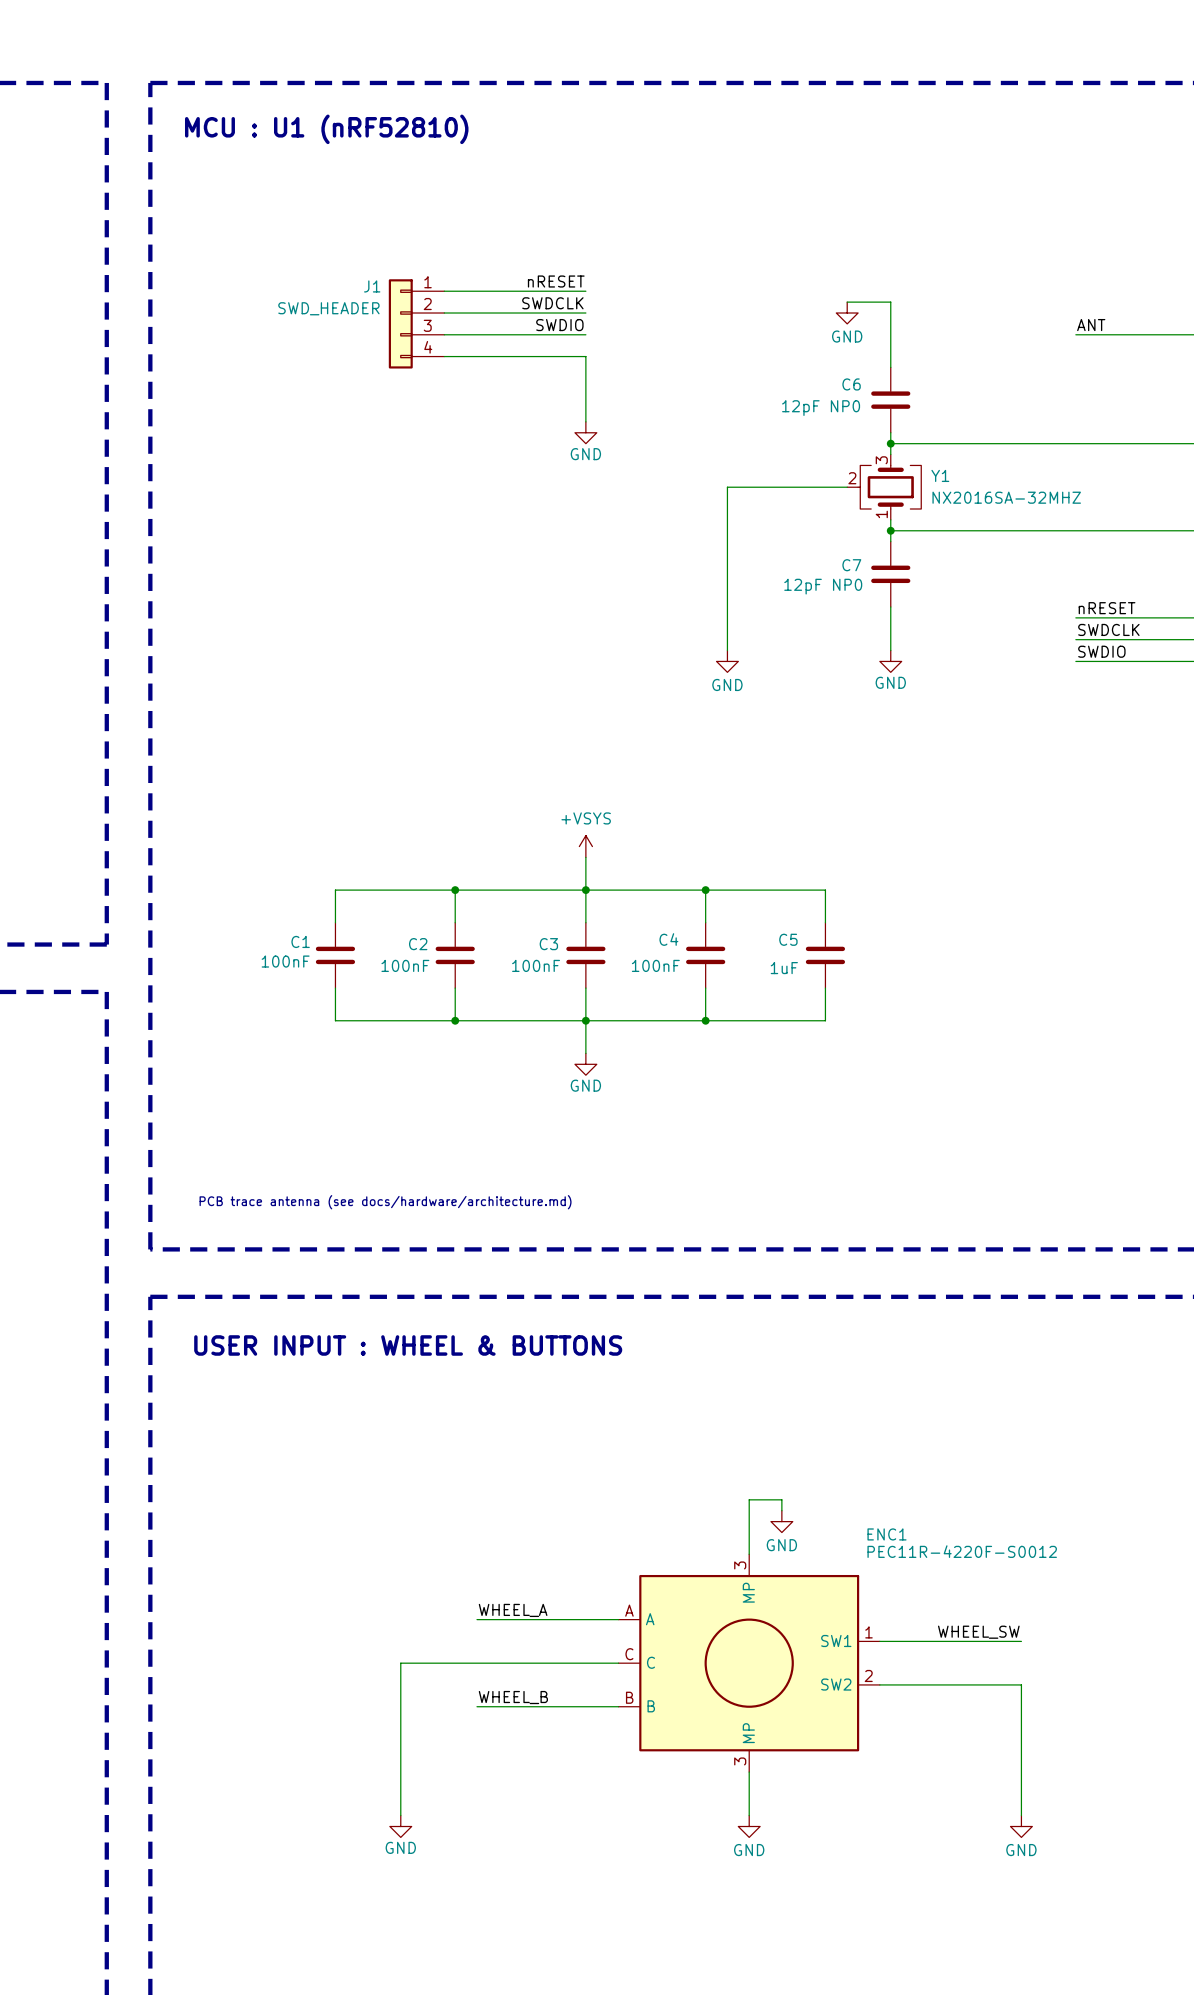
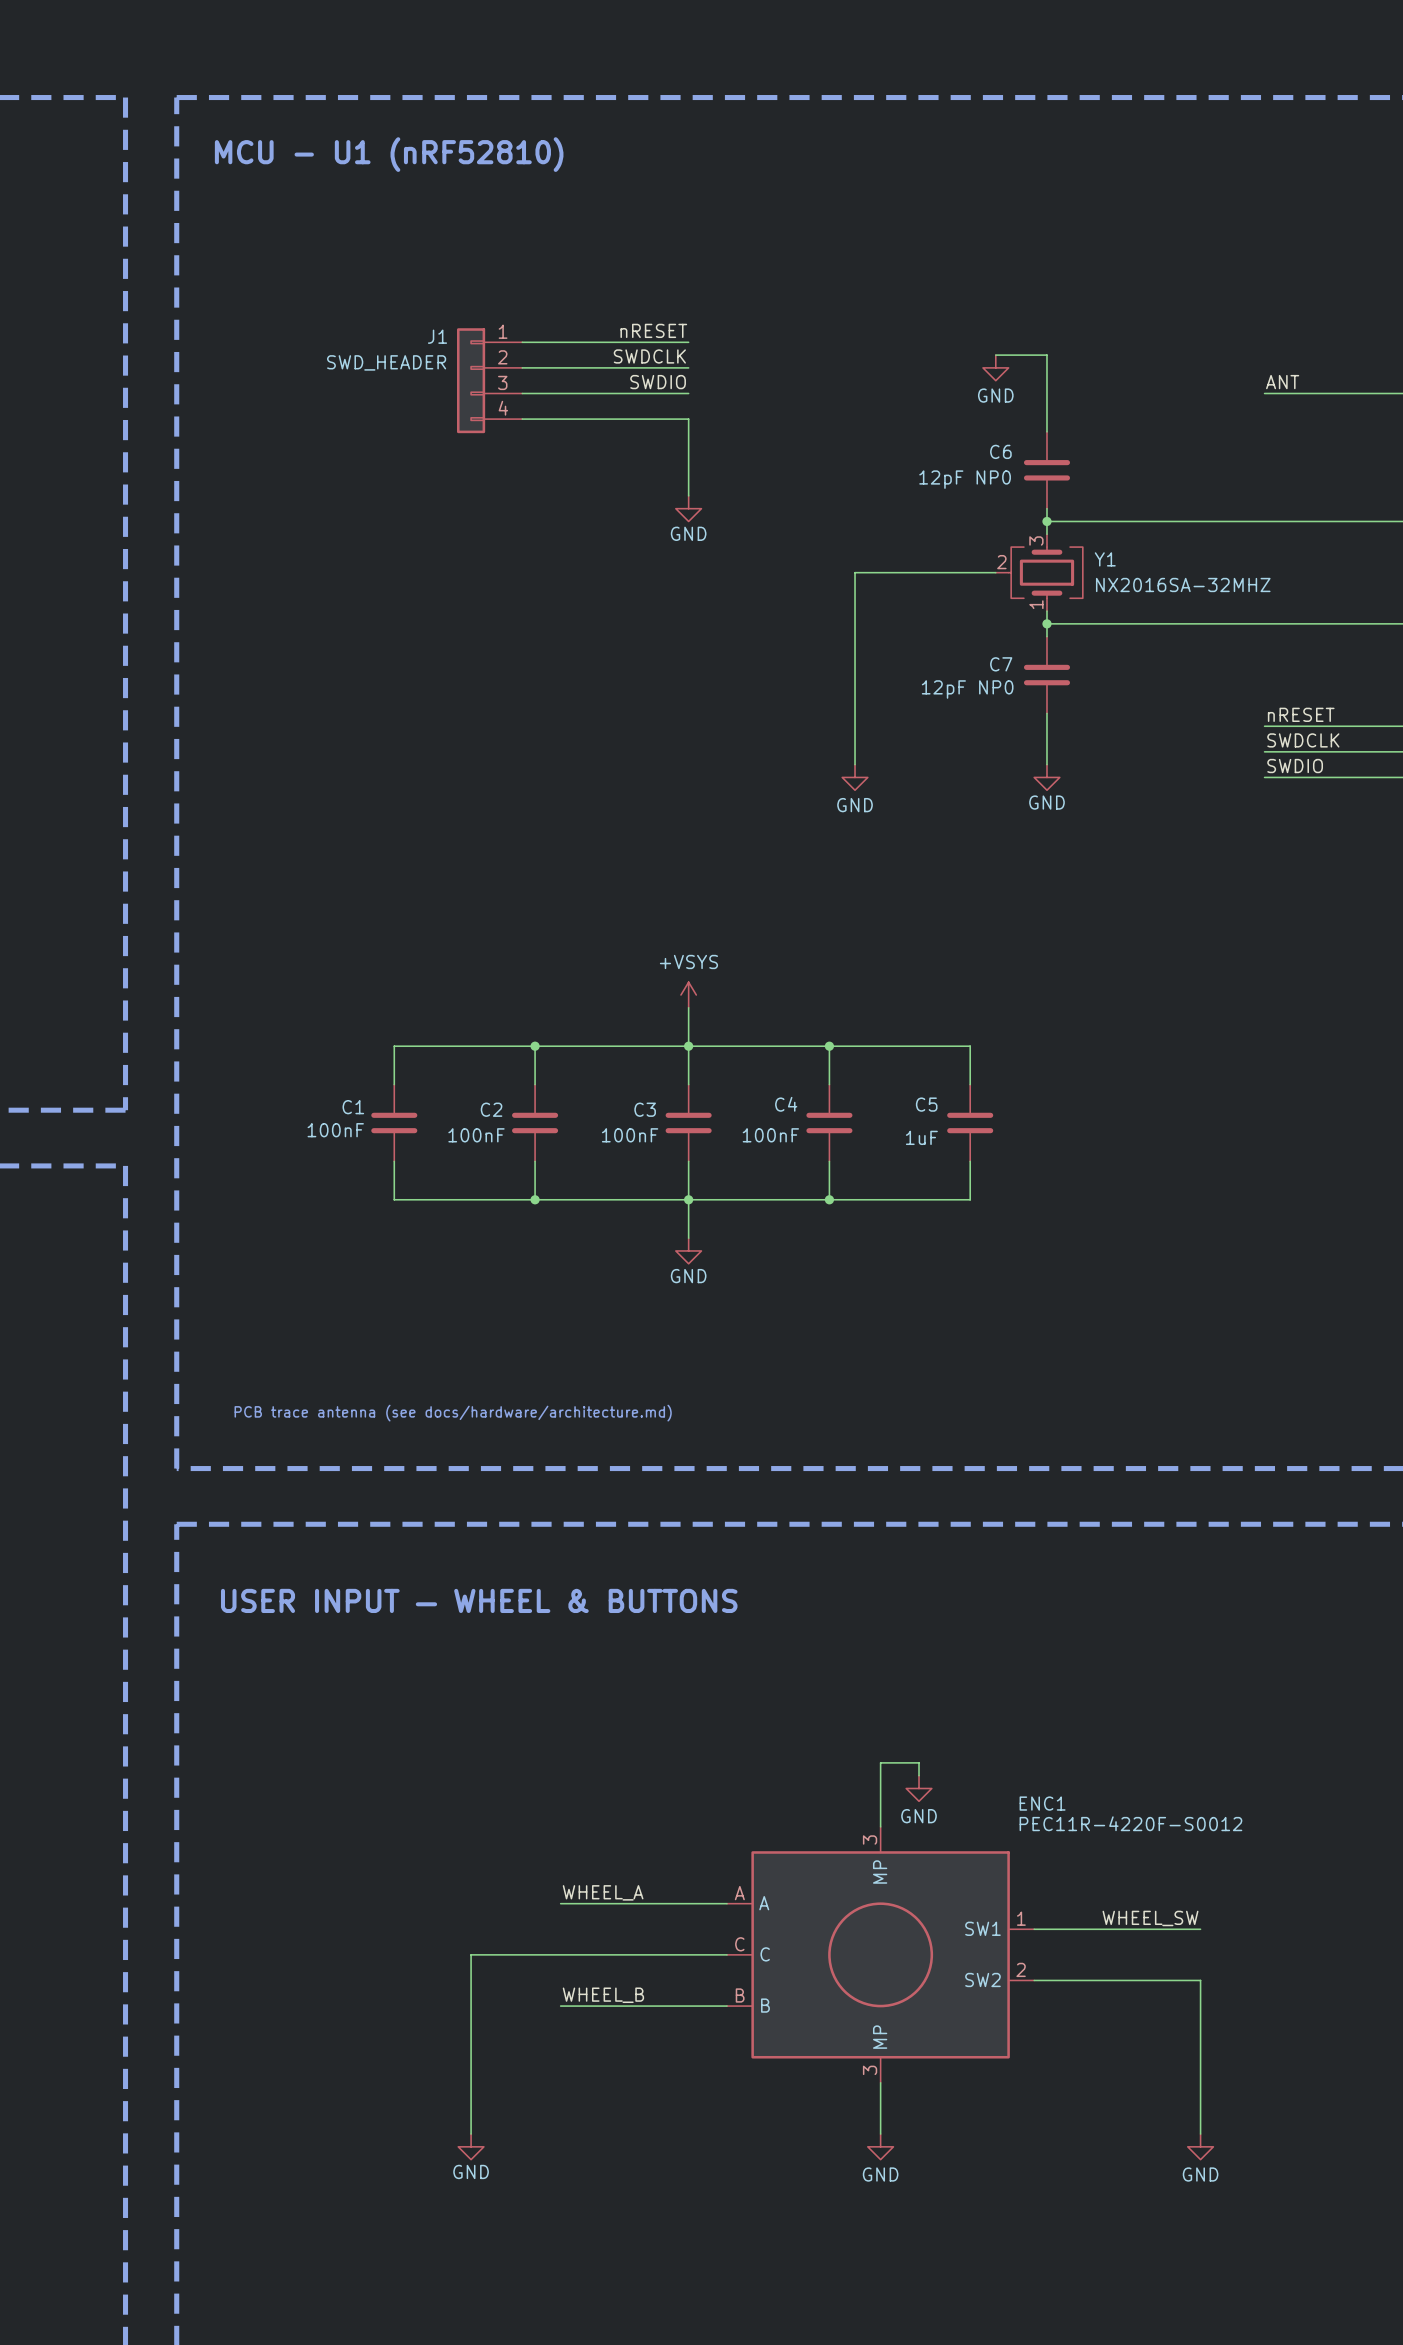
text: MCU : U1 (nRF52810) (326, 129) -> MCU - U1 (nRF52810) (389, 154)
text: USER INPUT : WHEEL & BUTTONS (408, 1345) -> none
text: none -> USER INPUT — WHEEL & BUTTONS (479, 1600)

